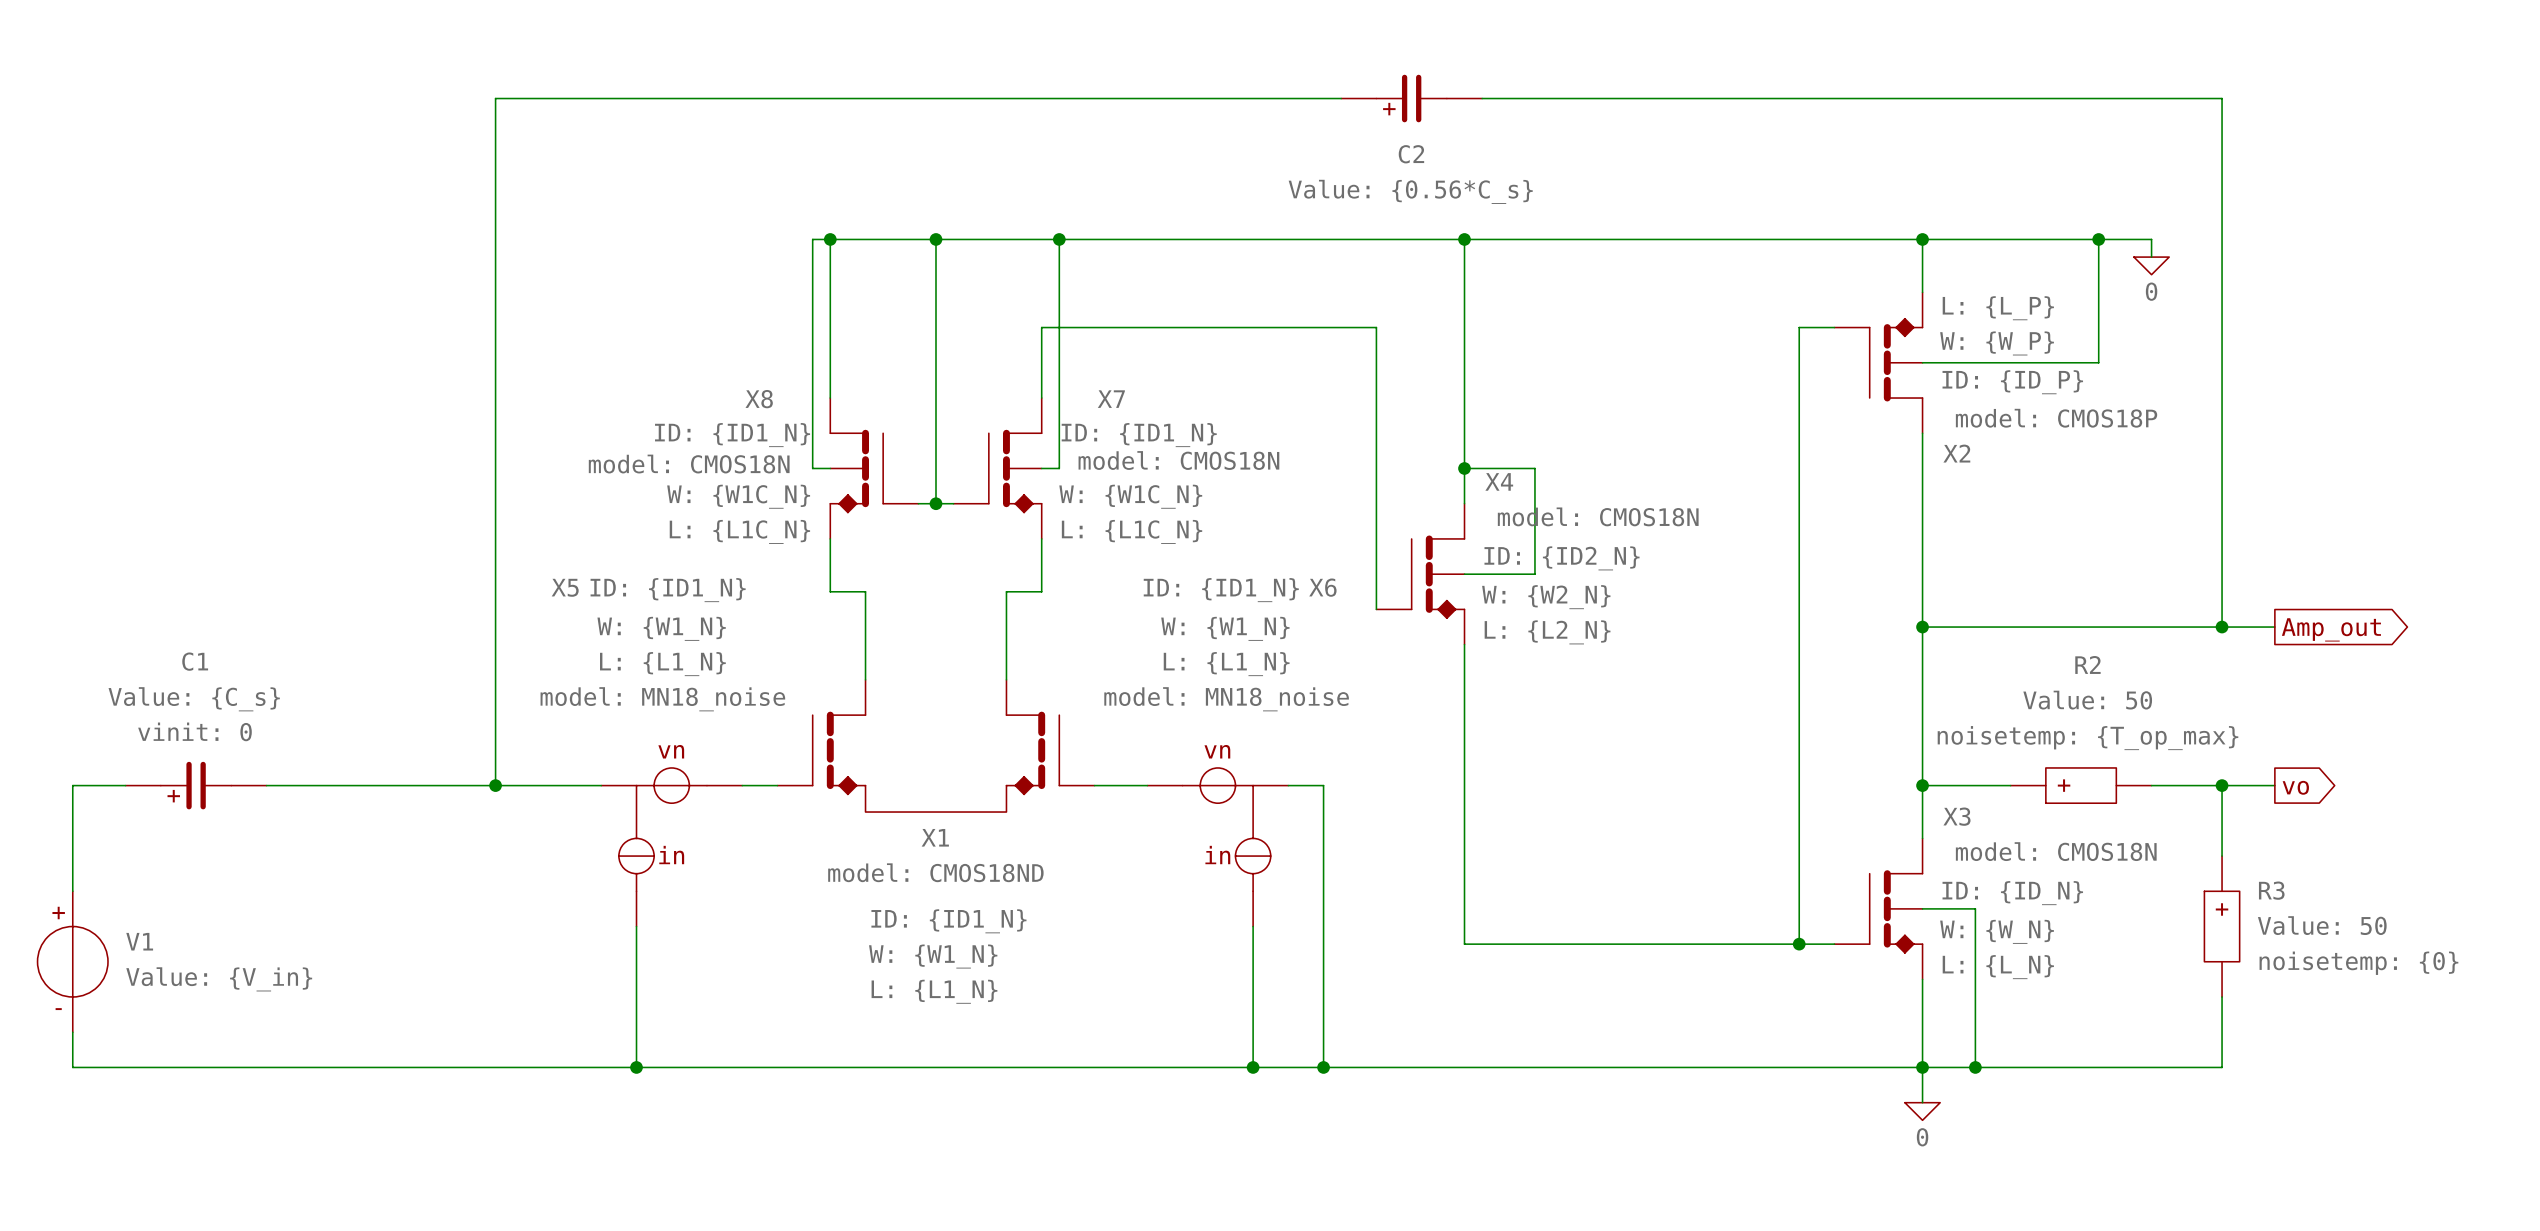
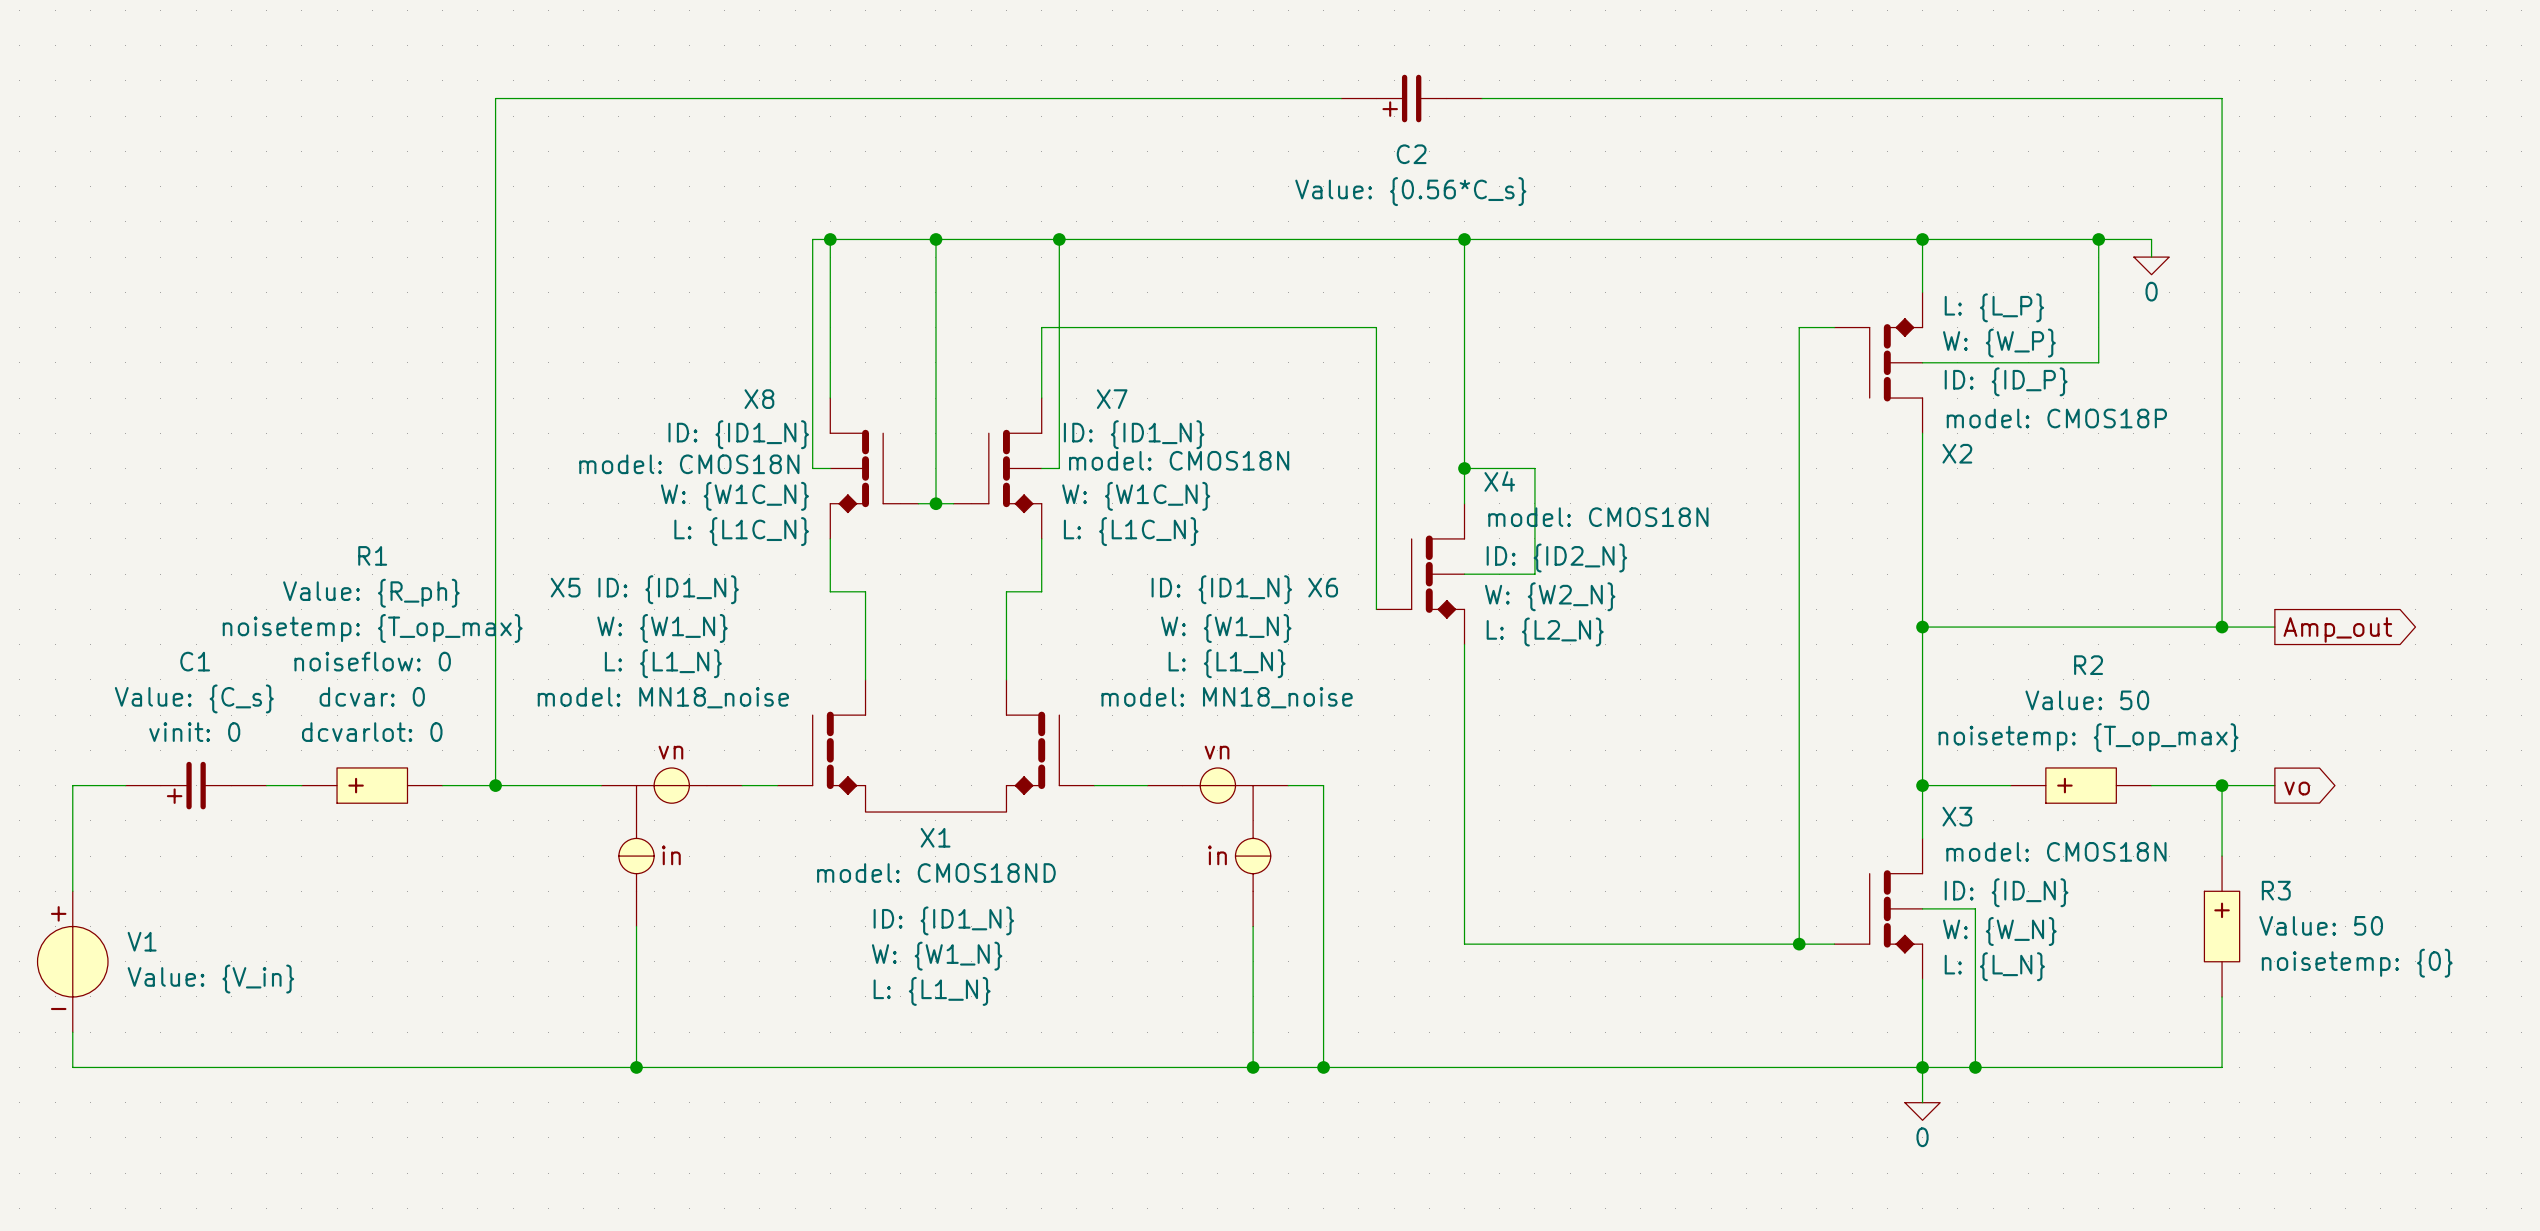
R1: none -> Value: {R_ph} (372, 785)

